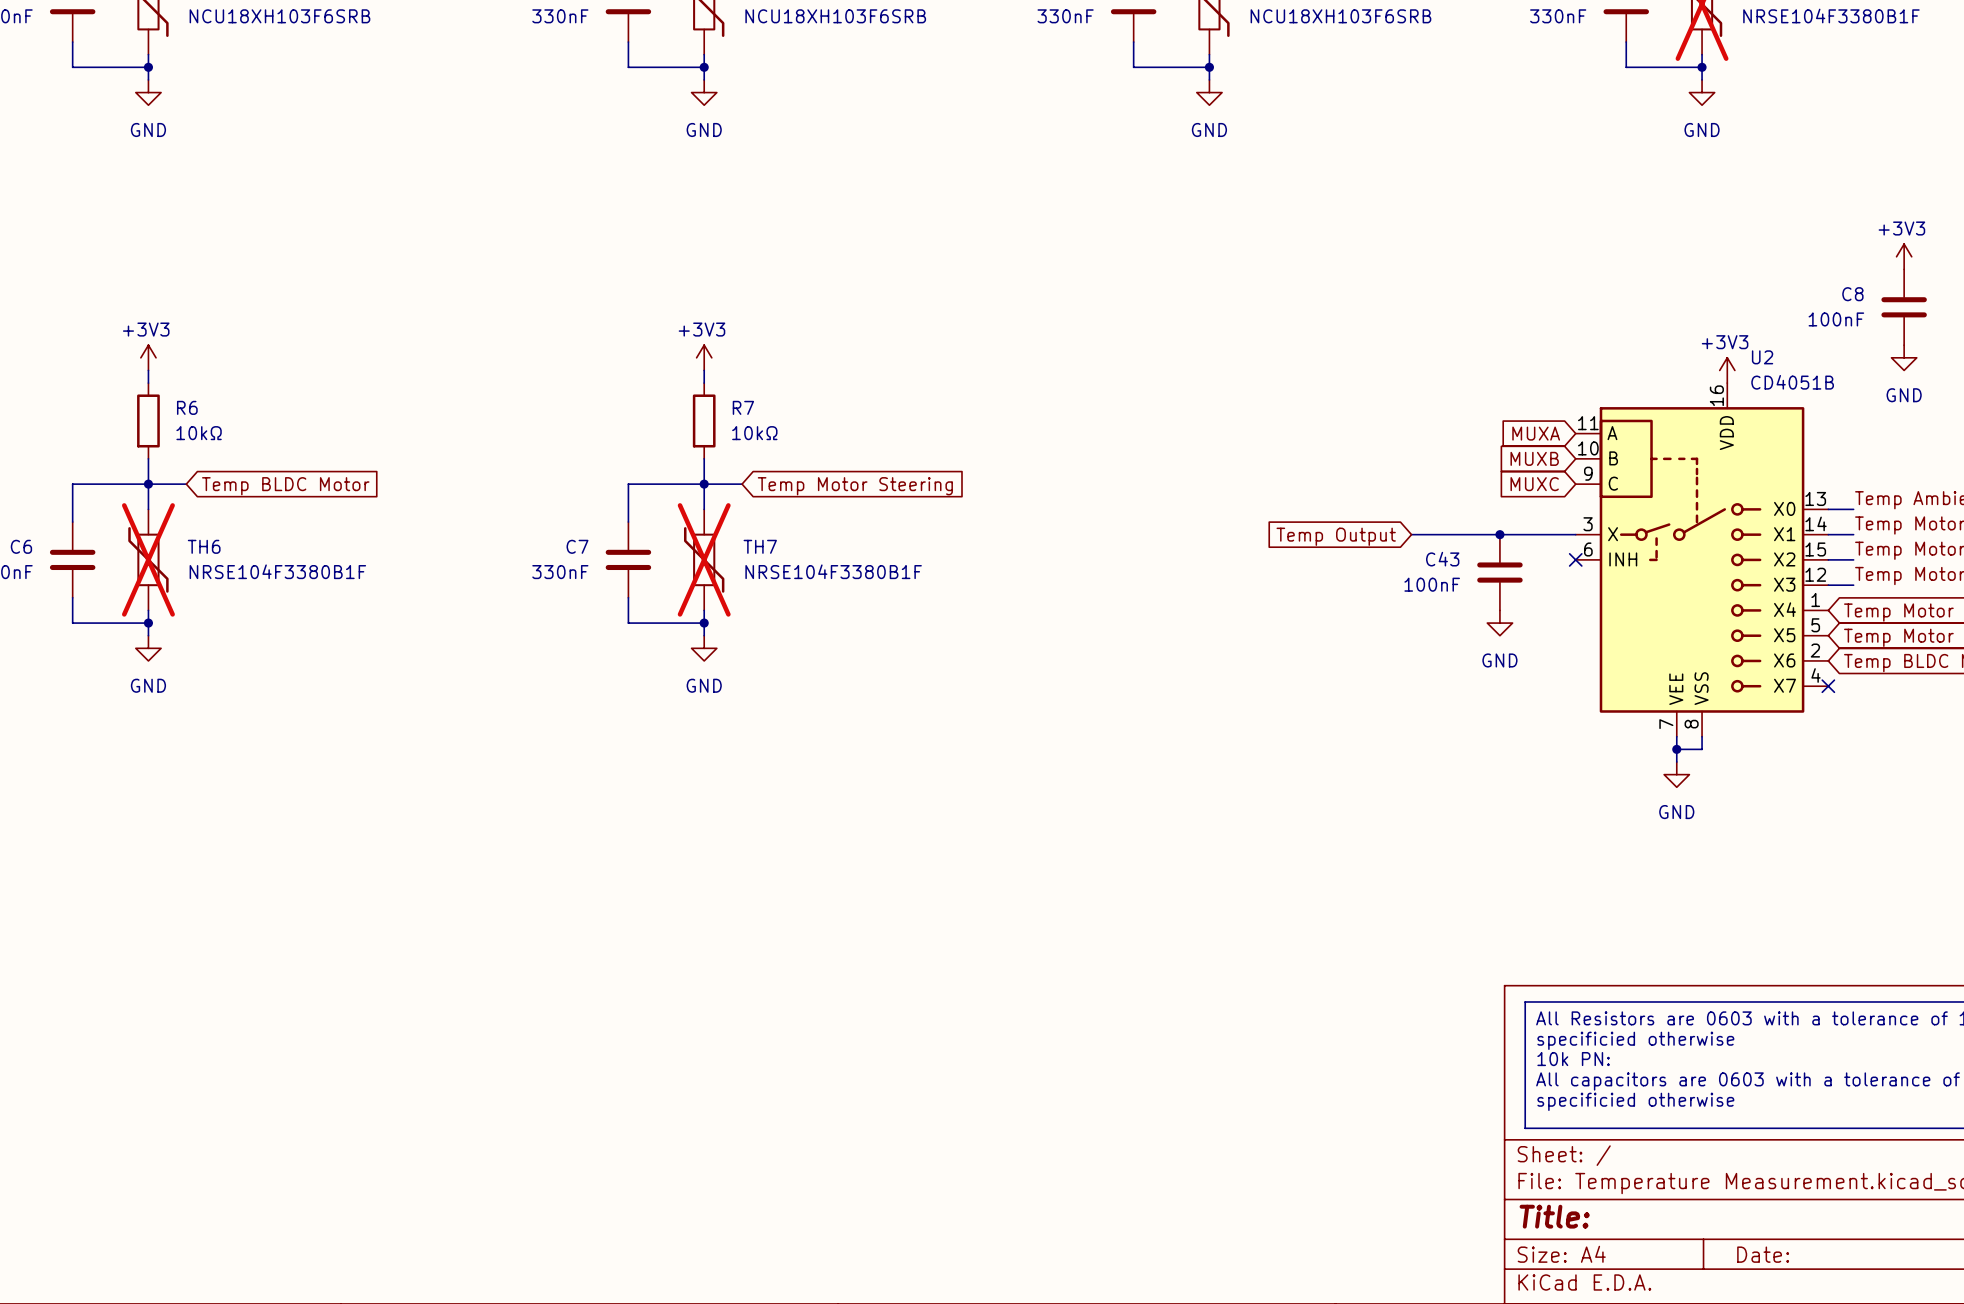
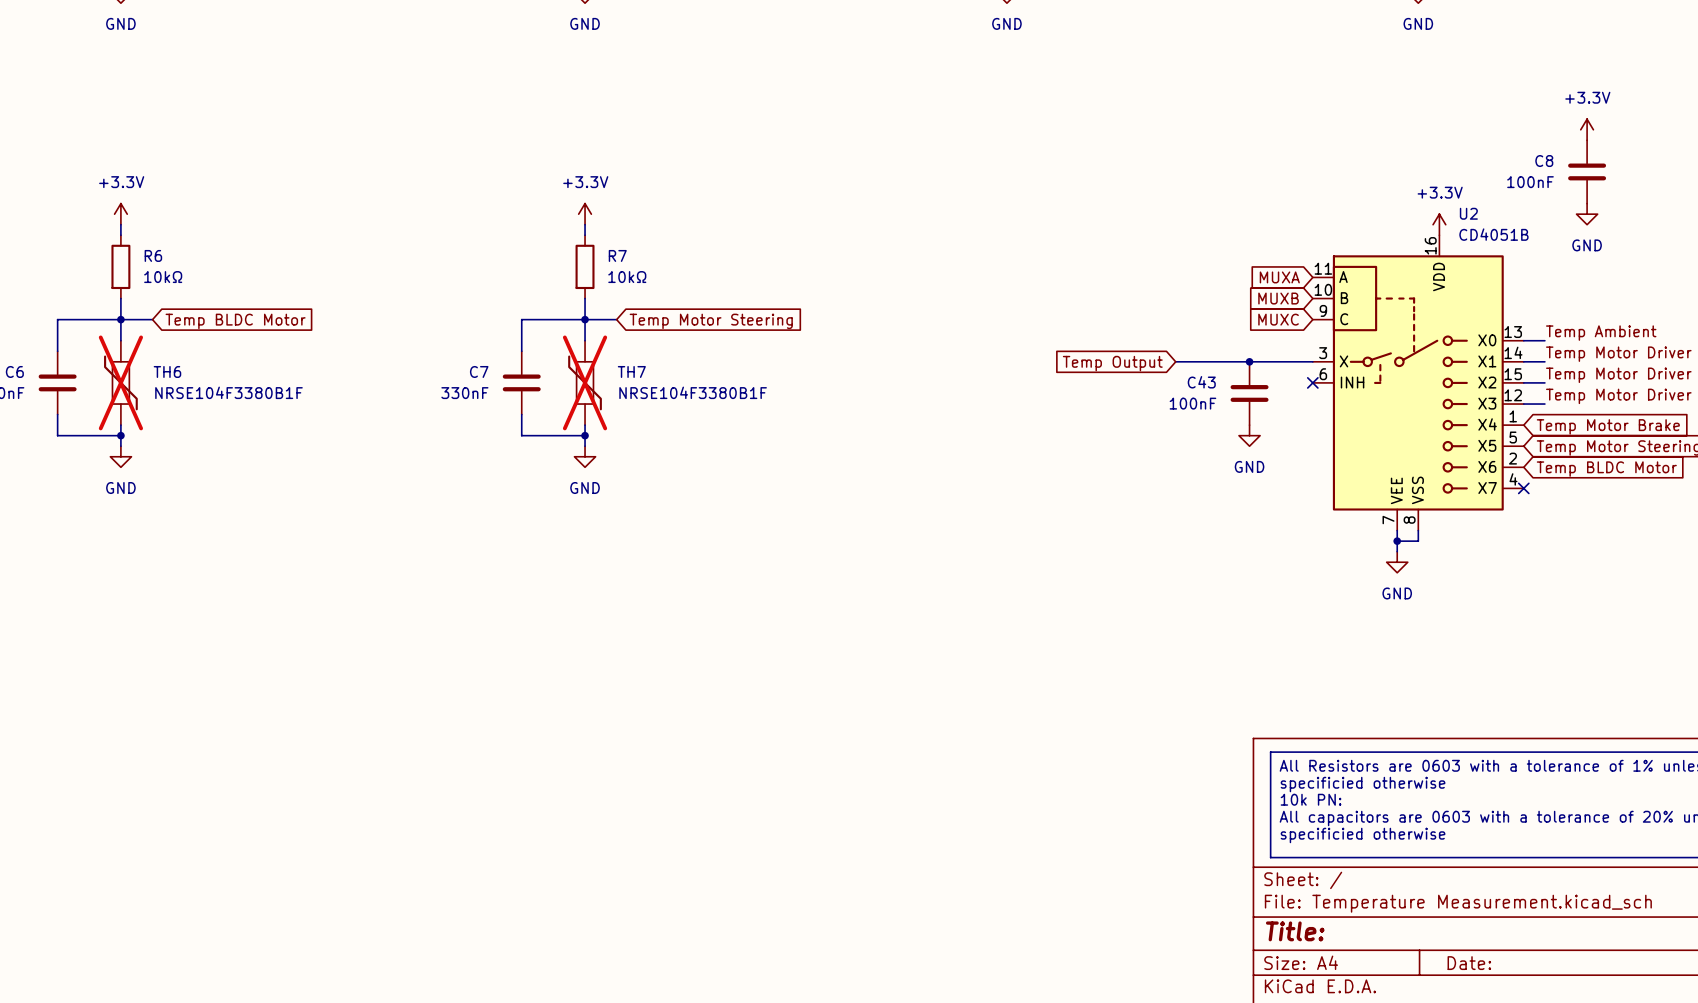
power symbol: +3V3 (1904, 256) -> +3.3V (1587, 129)
power symbol: +3V3 (148, 357) -> +3.3V (120, 214)
power symbol: +3V3 (704, 357) -> +3.3V (585, 214)
power symbol: +3V3 (1727, 370) -> +3.3V (1439, 224)

